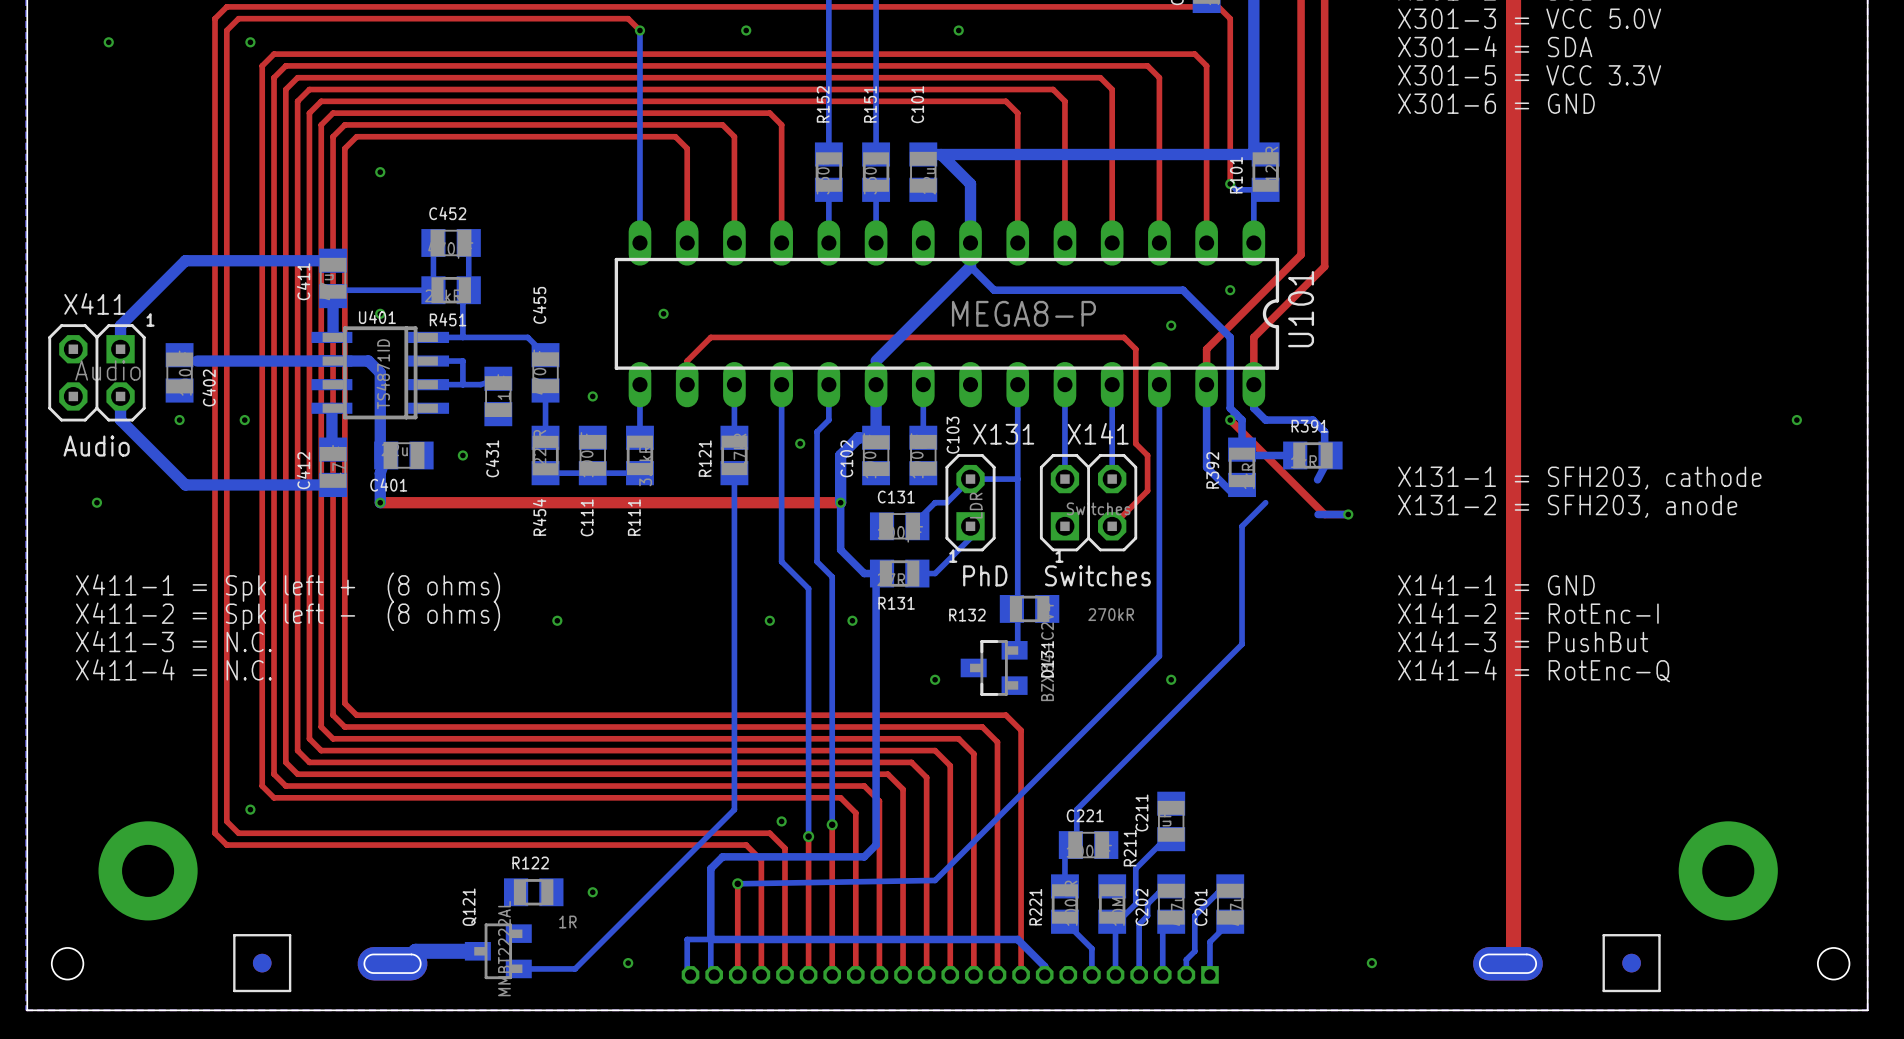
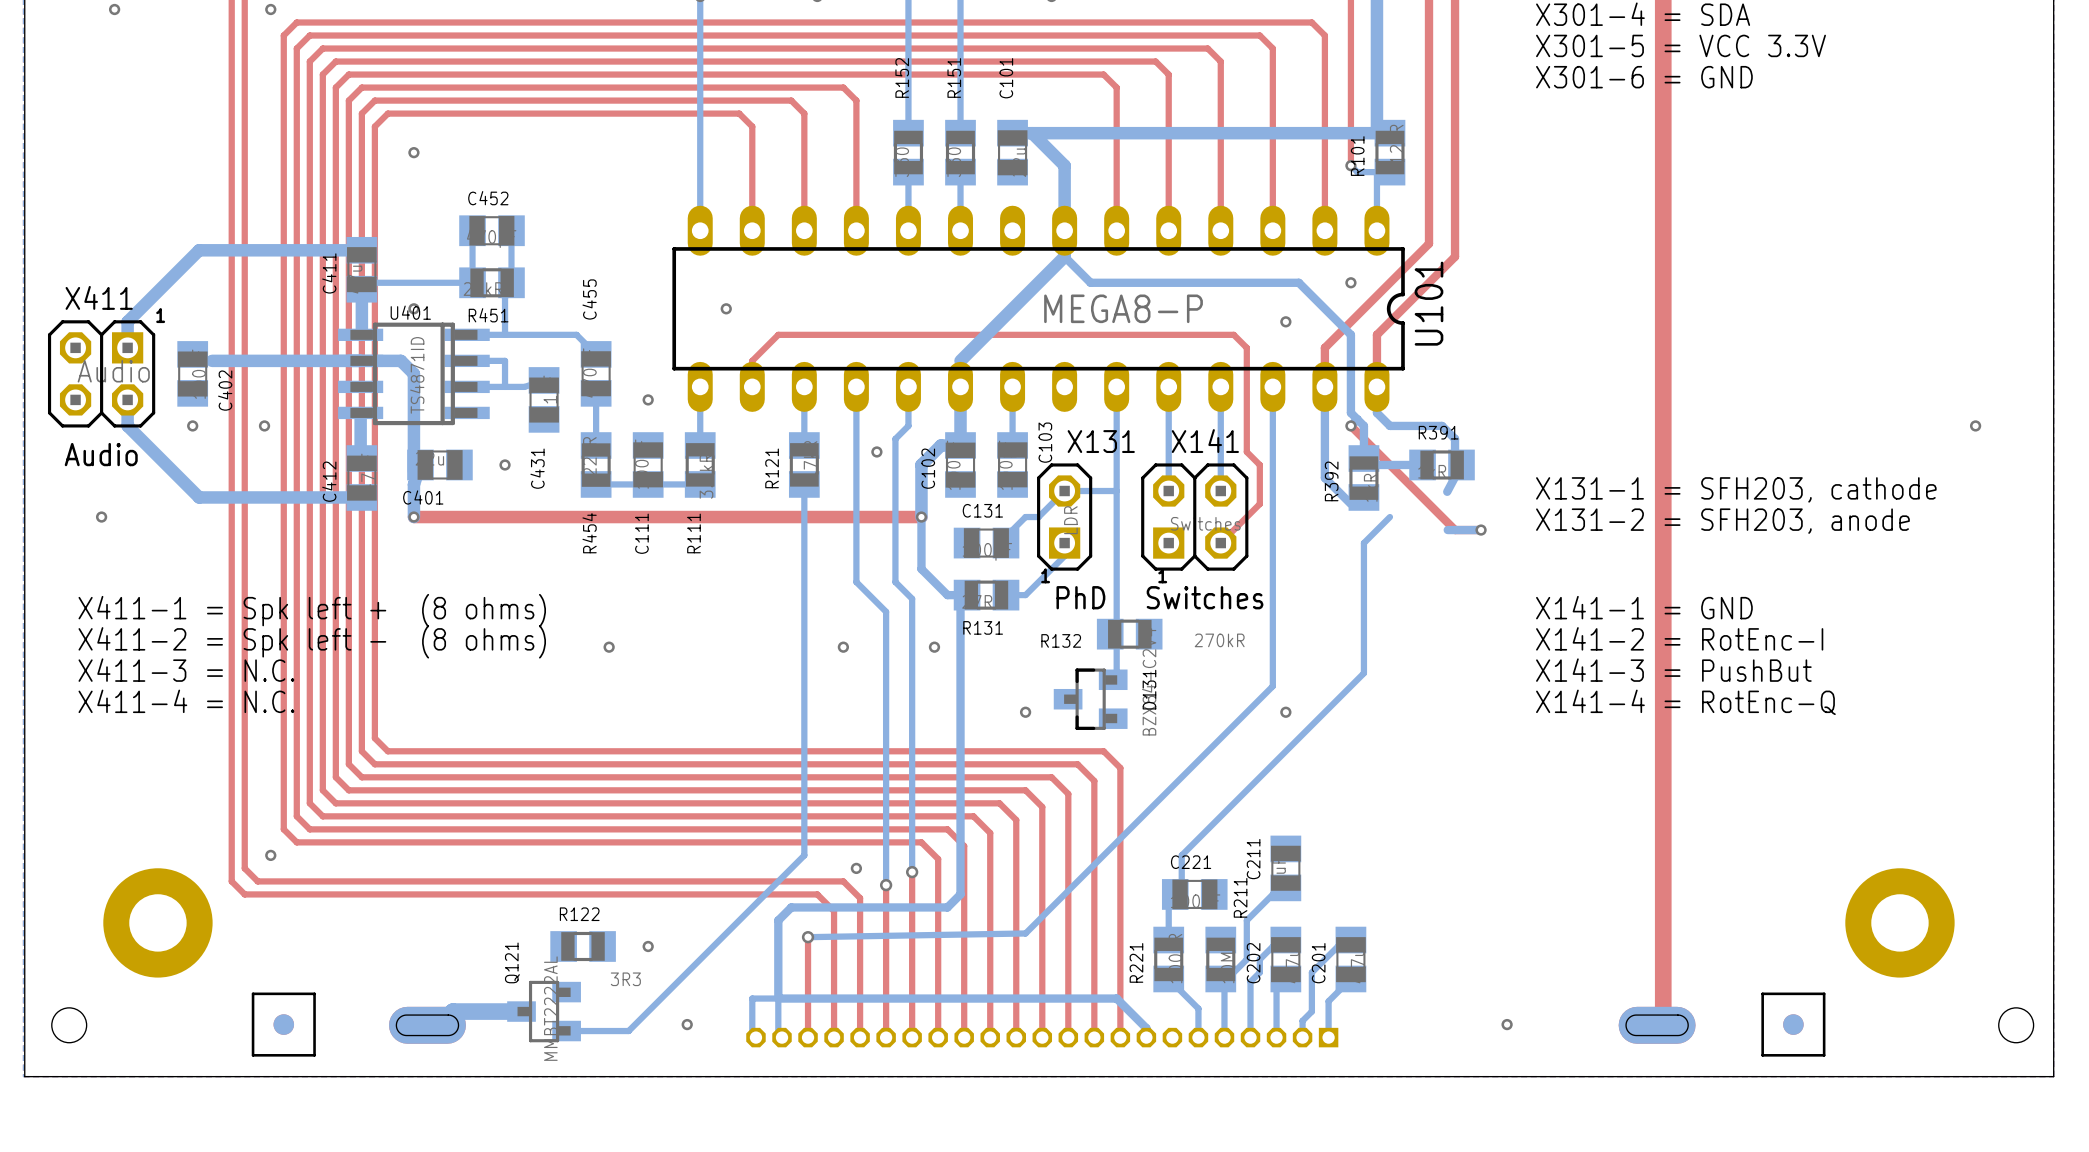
R122 value: 1R (567, 922) -> 3R3 (625, 979)

